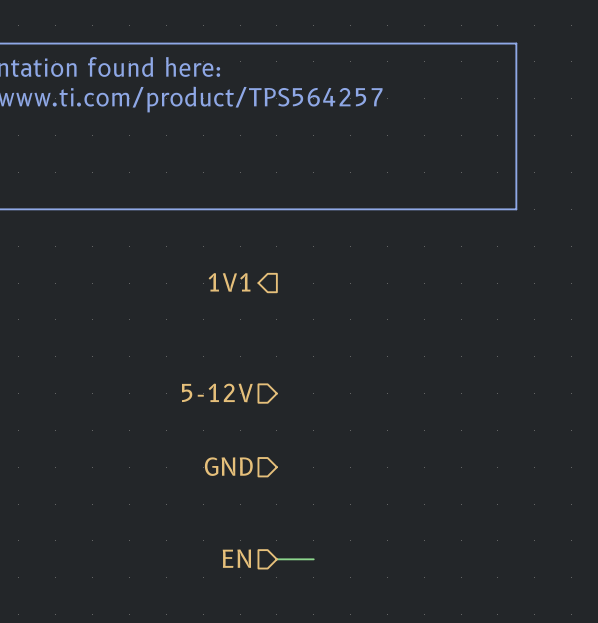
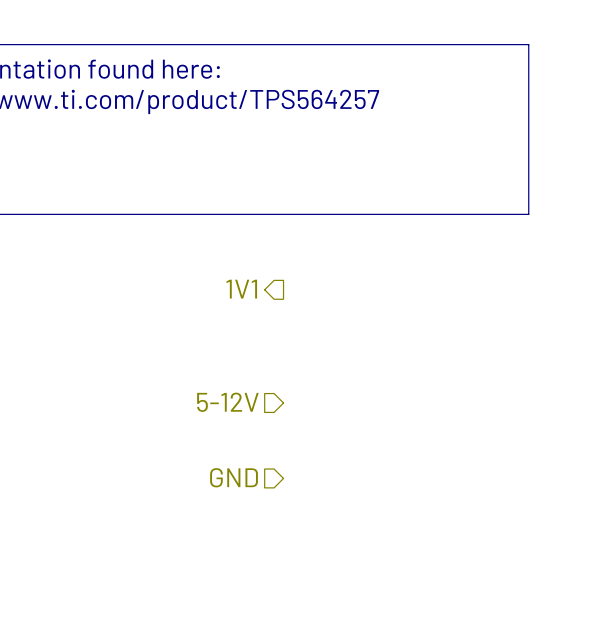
hierarchical label: EN (236, 558) -> none
wire: (276, 559) (313, 559) -> none

